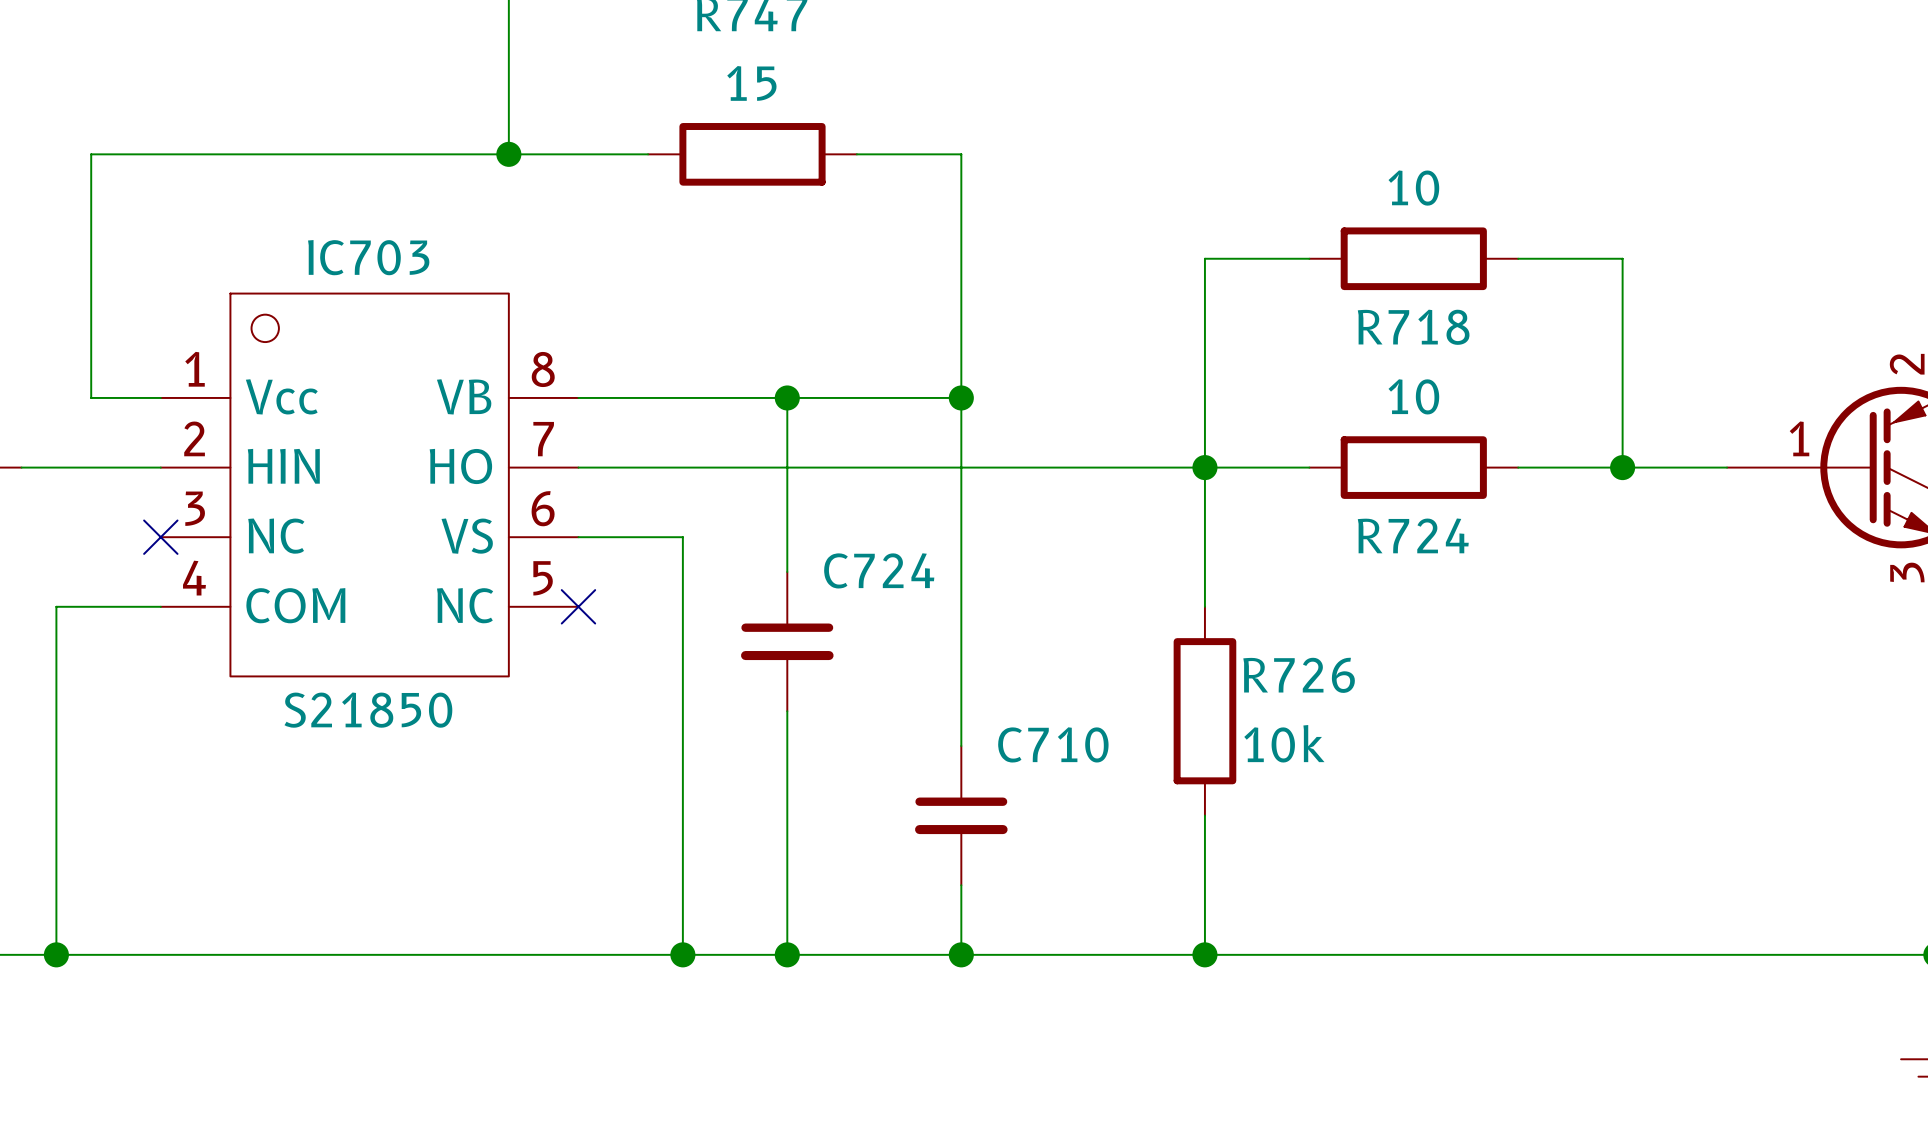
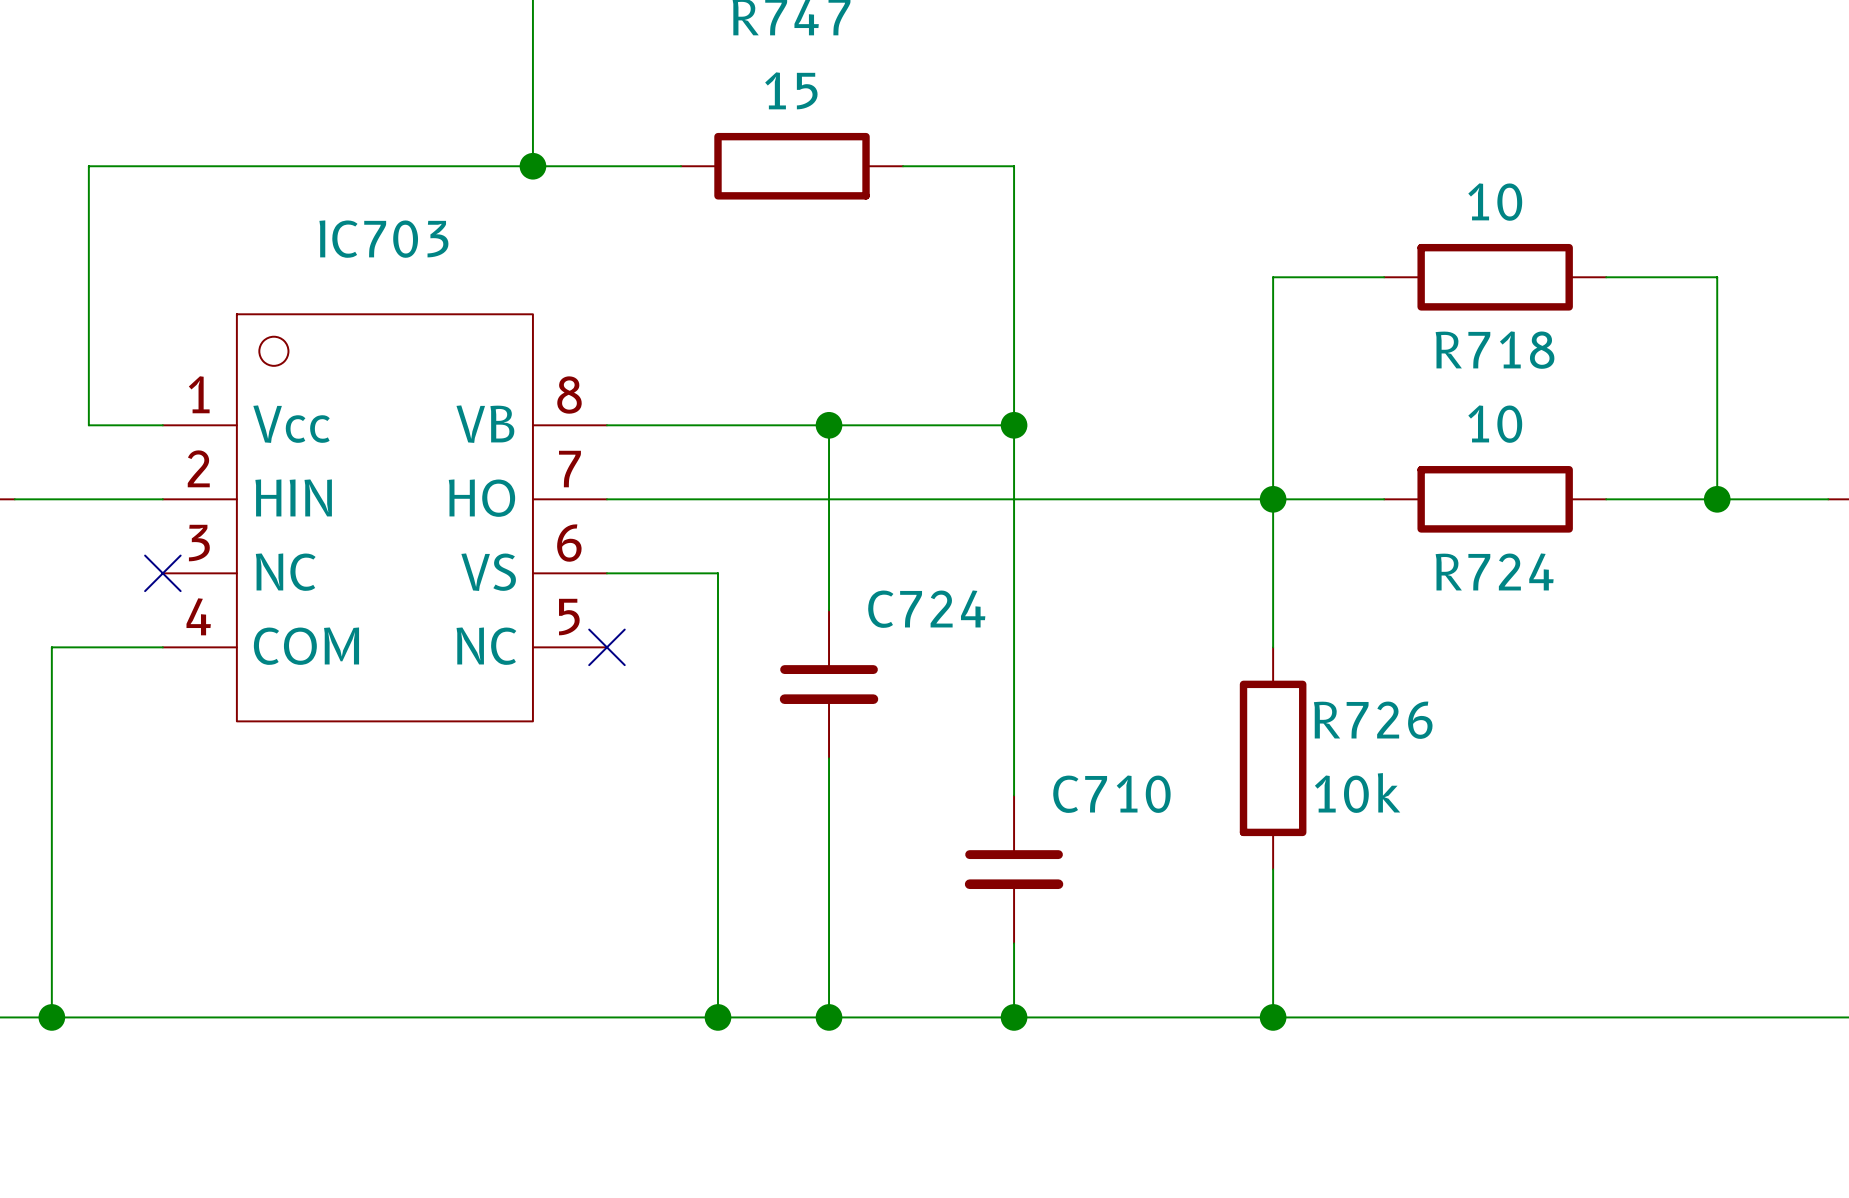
IC703 name position: IC703 (368, 257) -> IC703 (383, 239)
IC703 value: S21850 (368, 710) -> none

